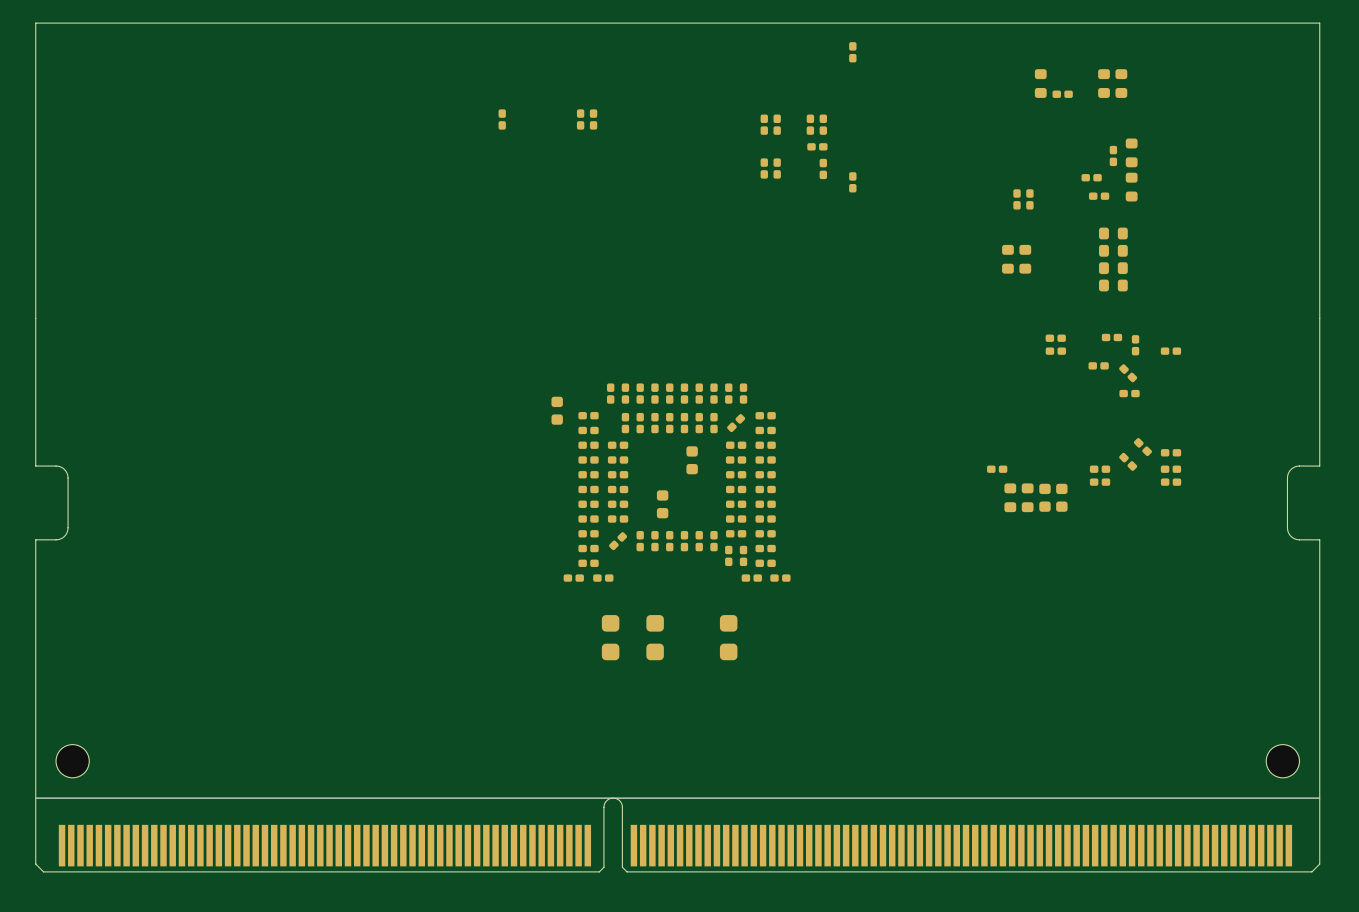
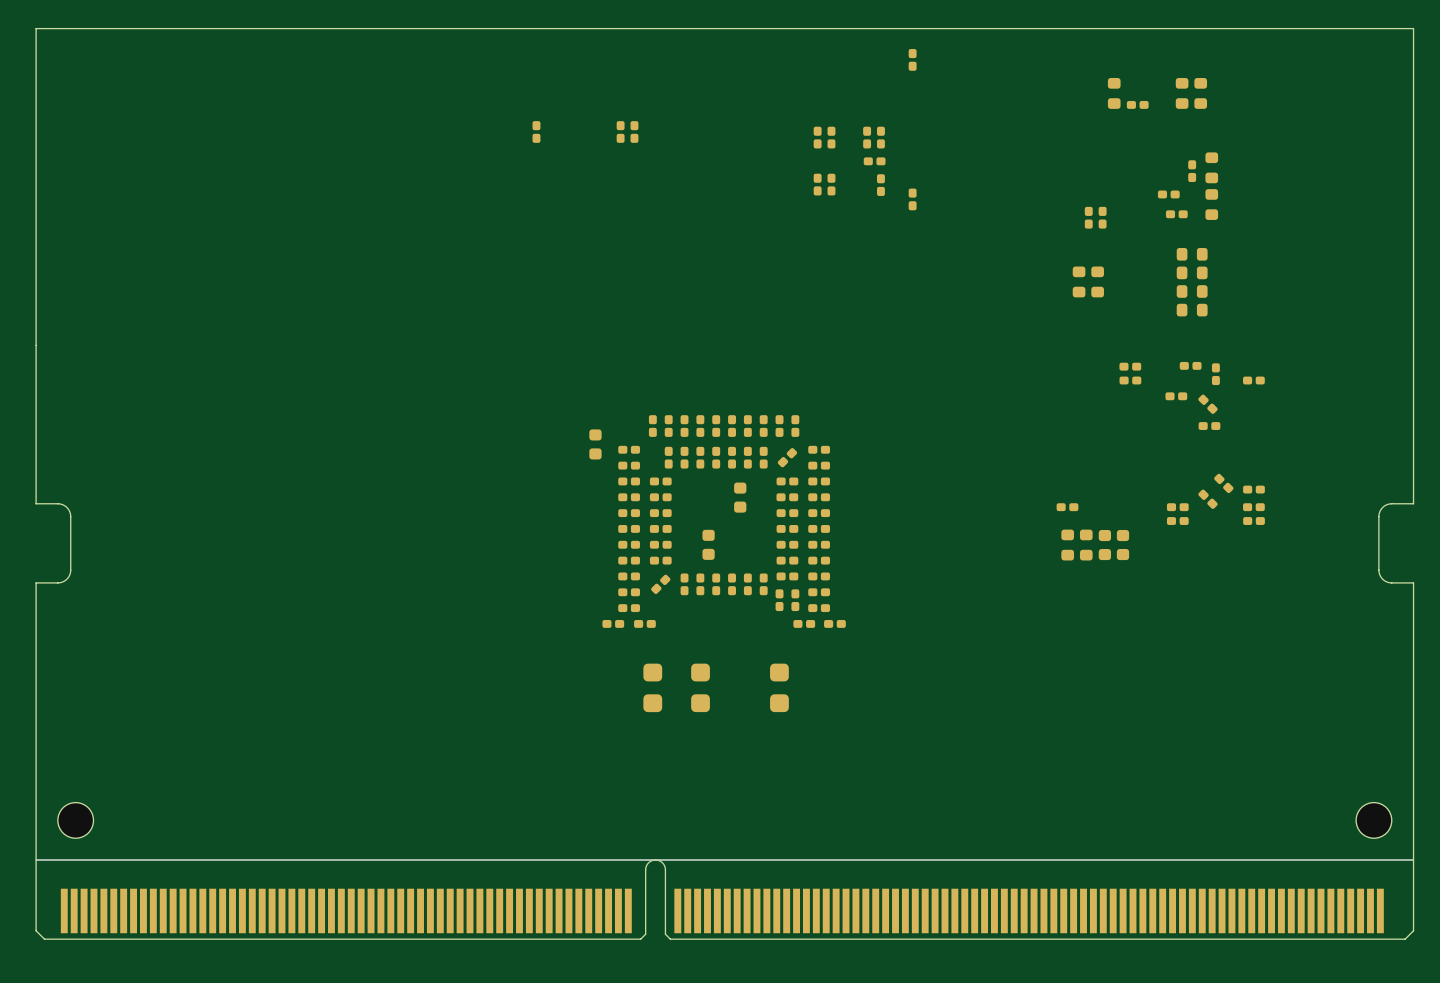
part: (1010, 497) -> none
part: (1027, 497) -> none
part: (1044, 497) -> none
part: (1061, 497) -> none
part: none -> (1067, 545)
part: none -> (1086, 545)
part: none -> (1104, 545)
part: none -> (1122, 545)

